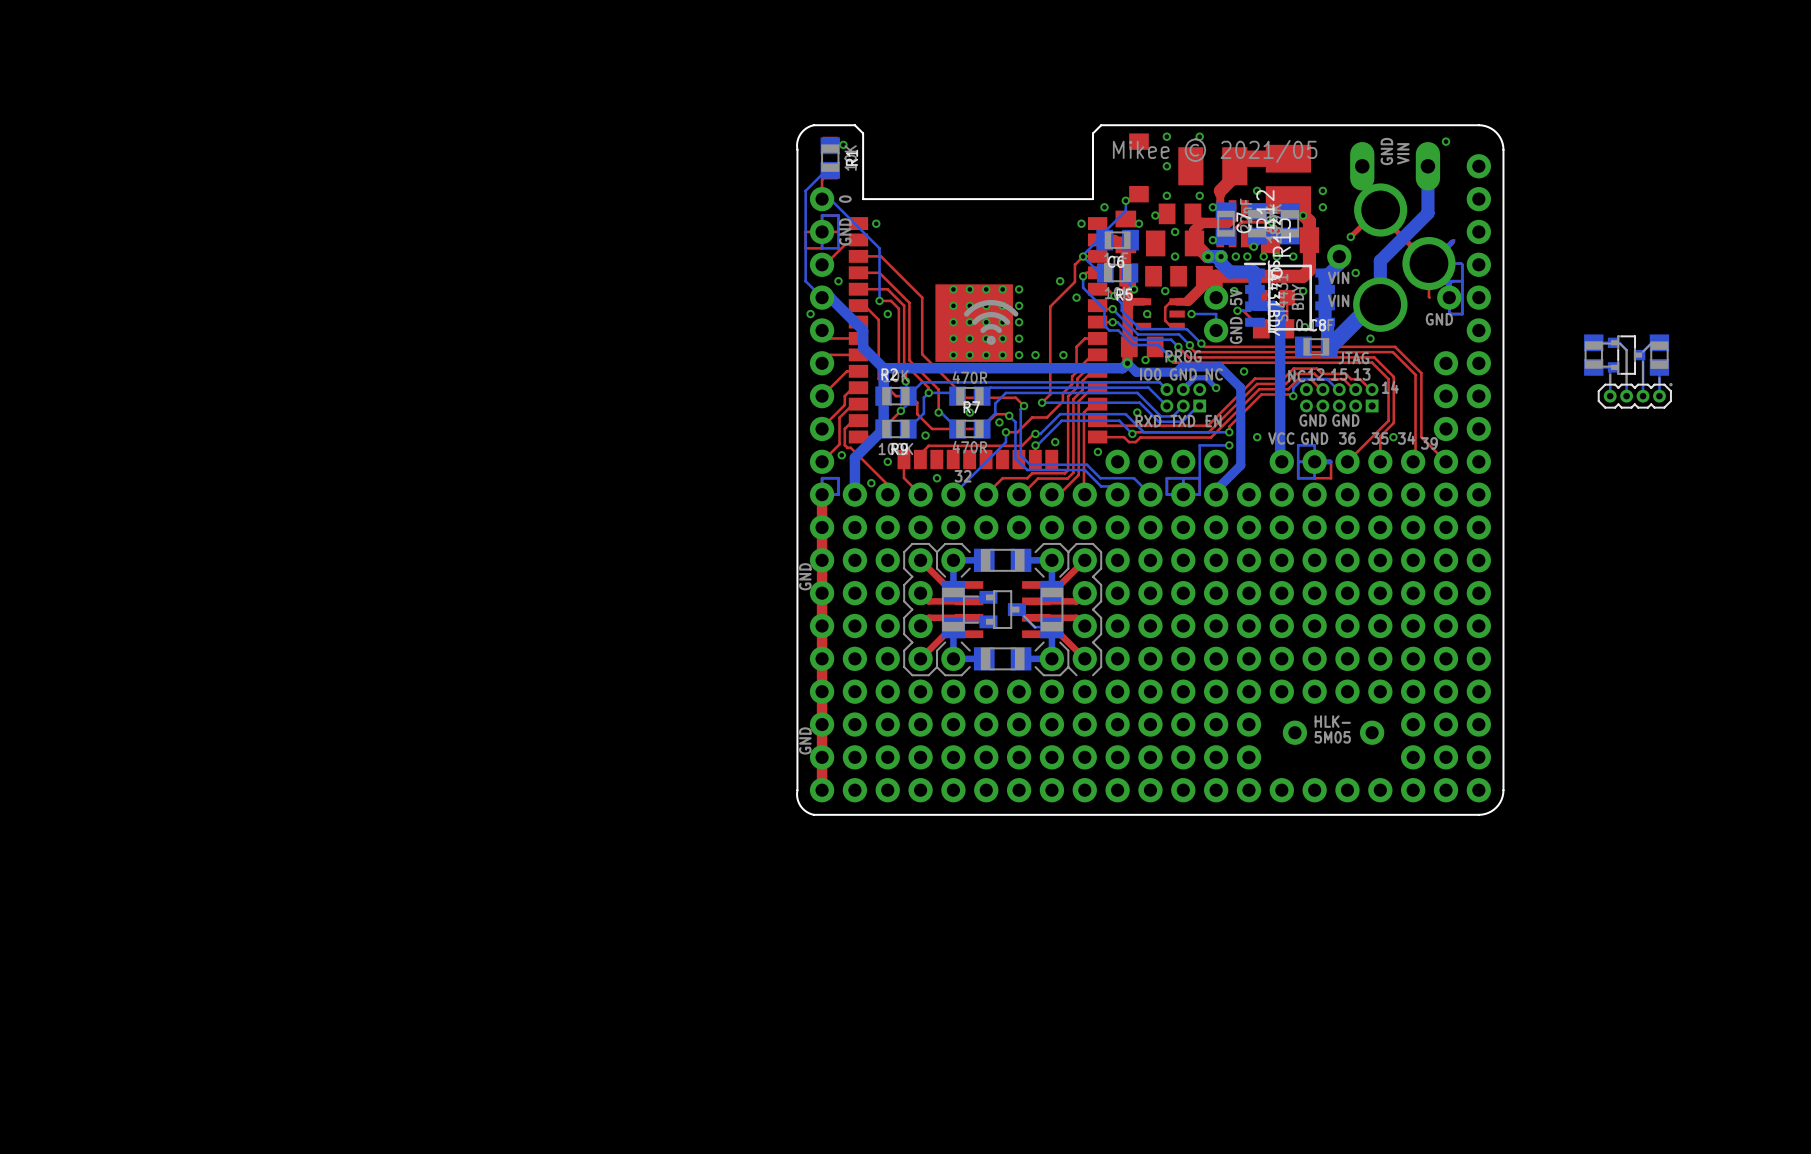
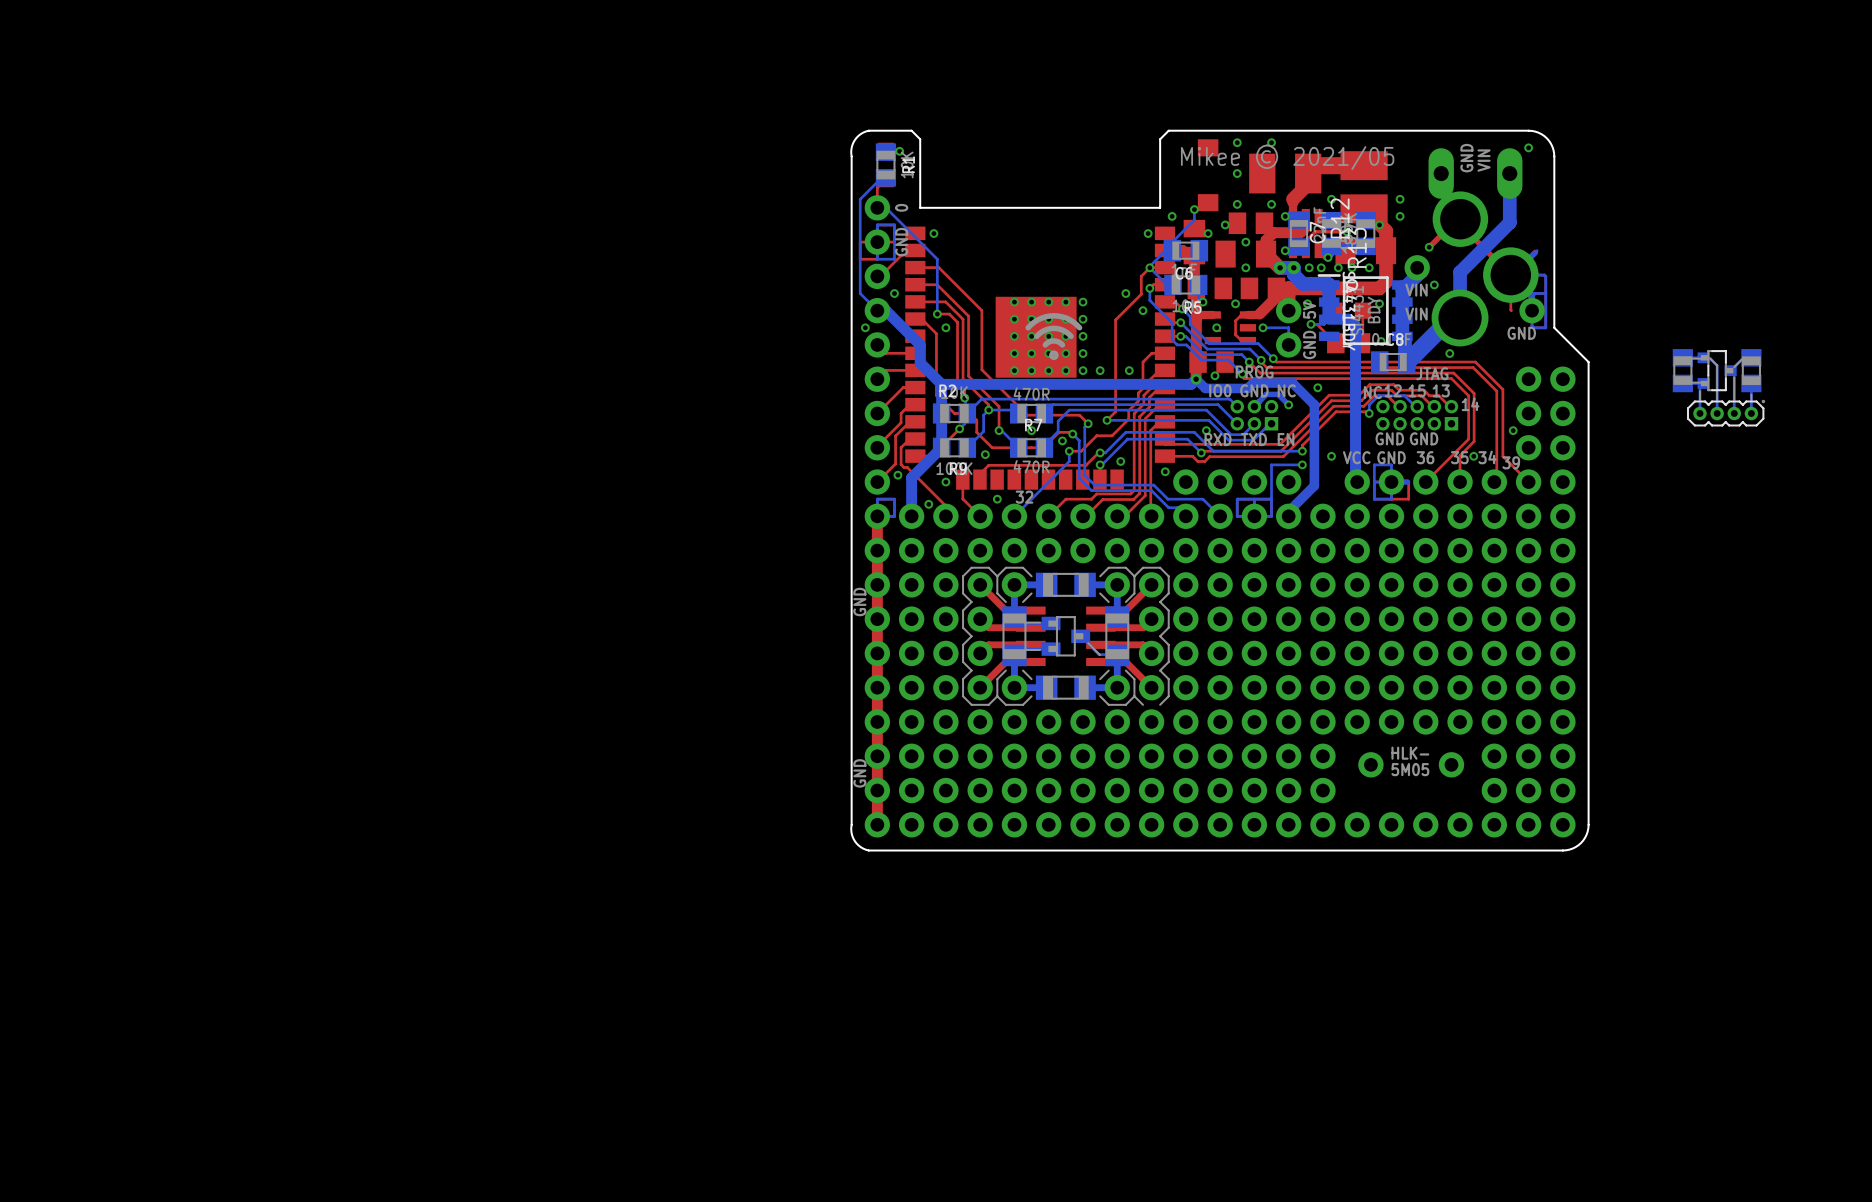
board edge: (1446, 125) (1485, 126) (1496, 132) (1502, 143) (1503, 346) -> (1528, 130) (1544, 136) (1550, 143) (1554, 153) (1554, 327) (1588, 362)
part: (1478, 314) -> none
via: none -> (1513, 430)

